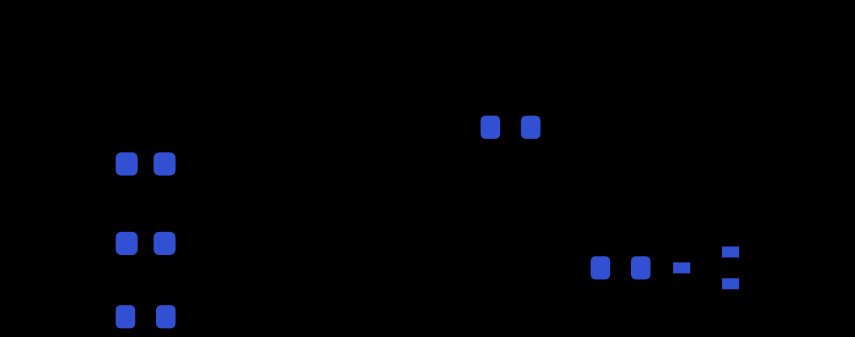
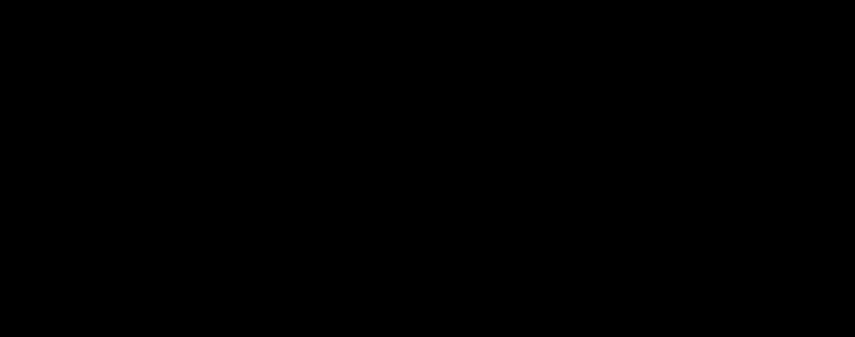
part: (510, 127) -> none
part: (145, 163) -> none
part: (145, 243) -> none
part: (620, 267) -> none
part: (706, 267) -> none
part: (145, 316) -> none

